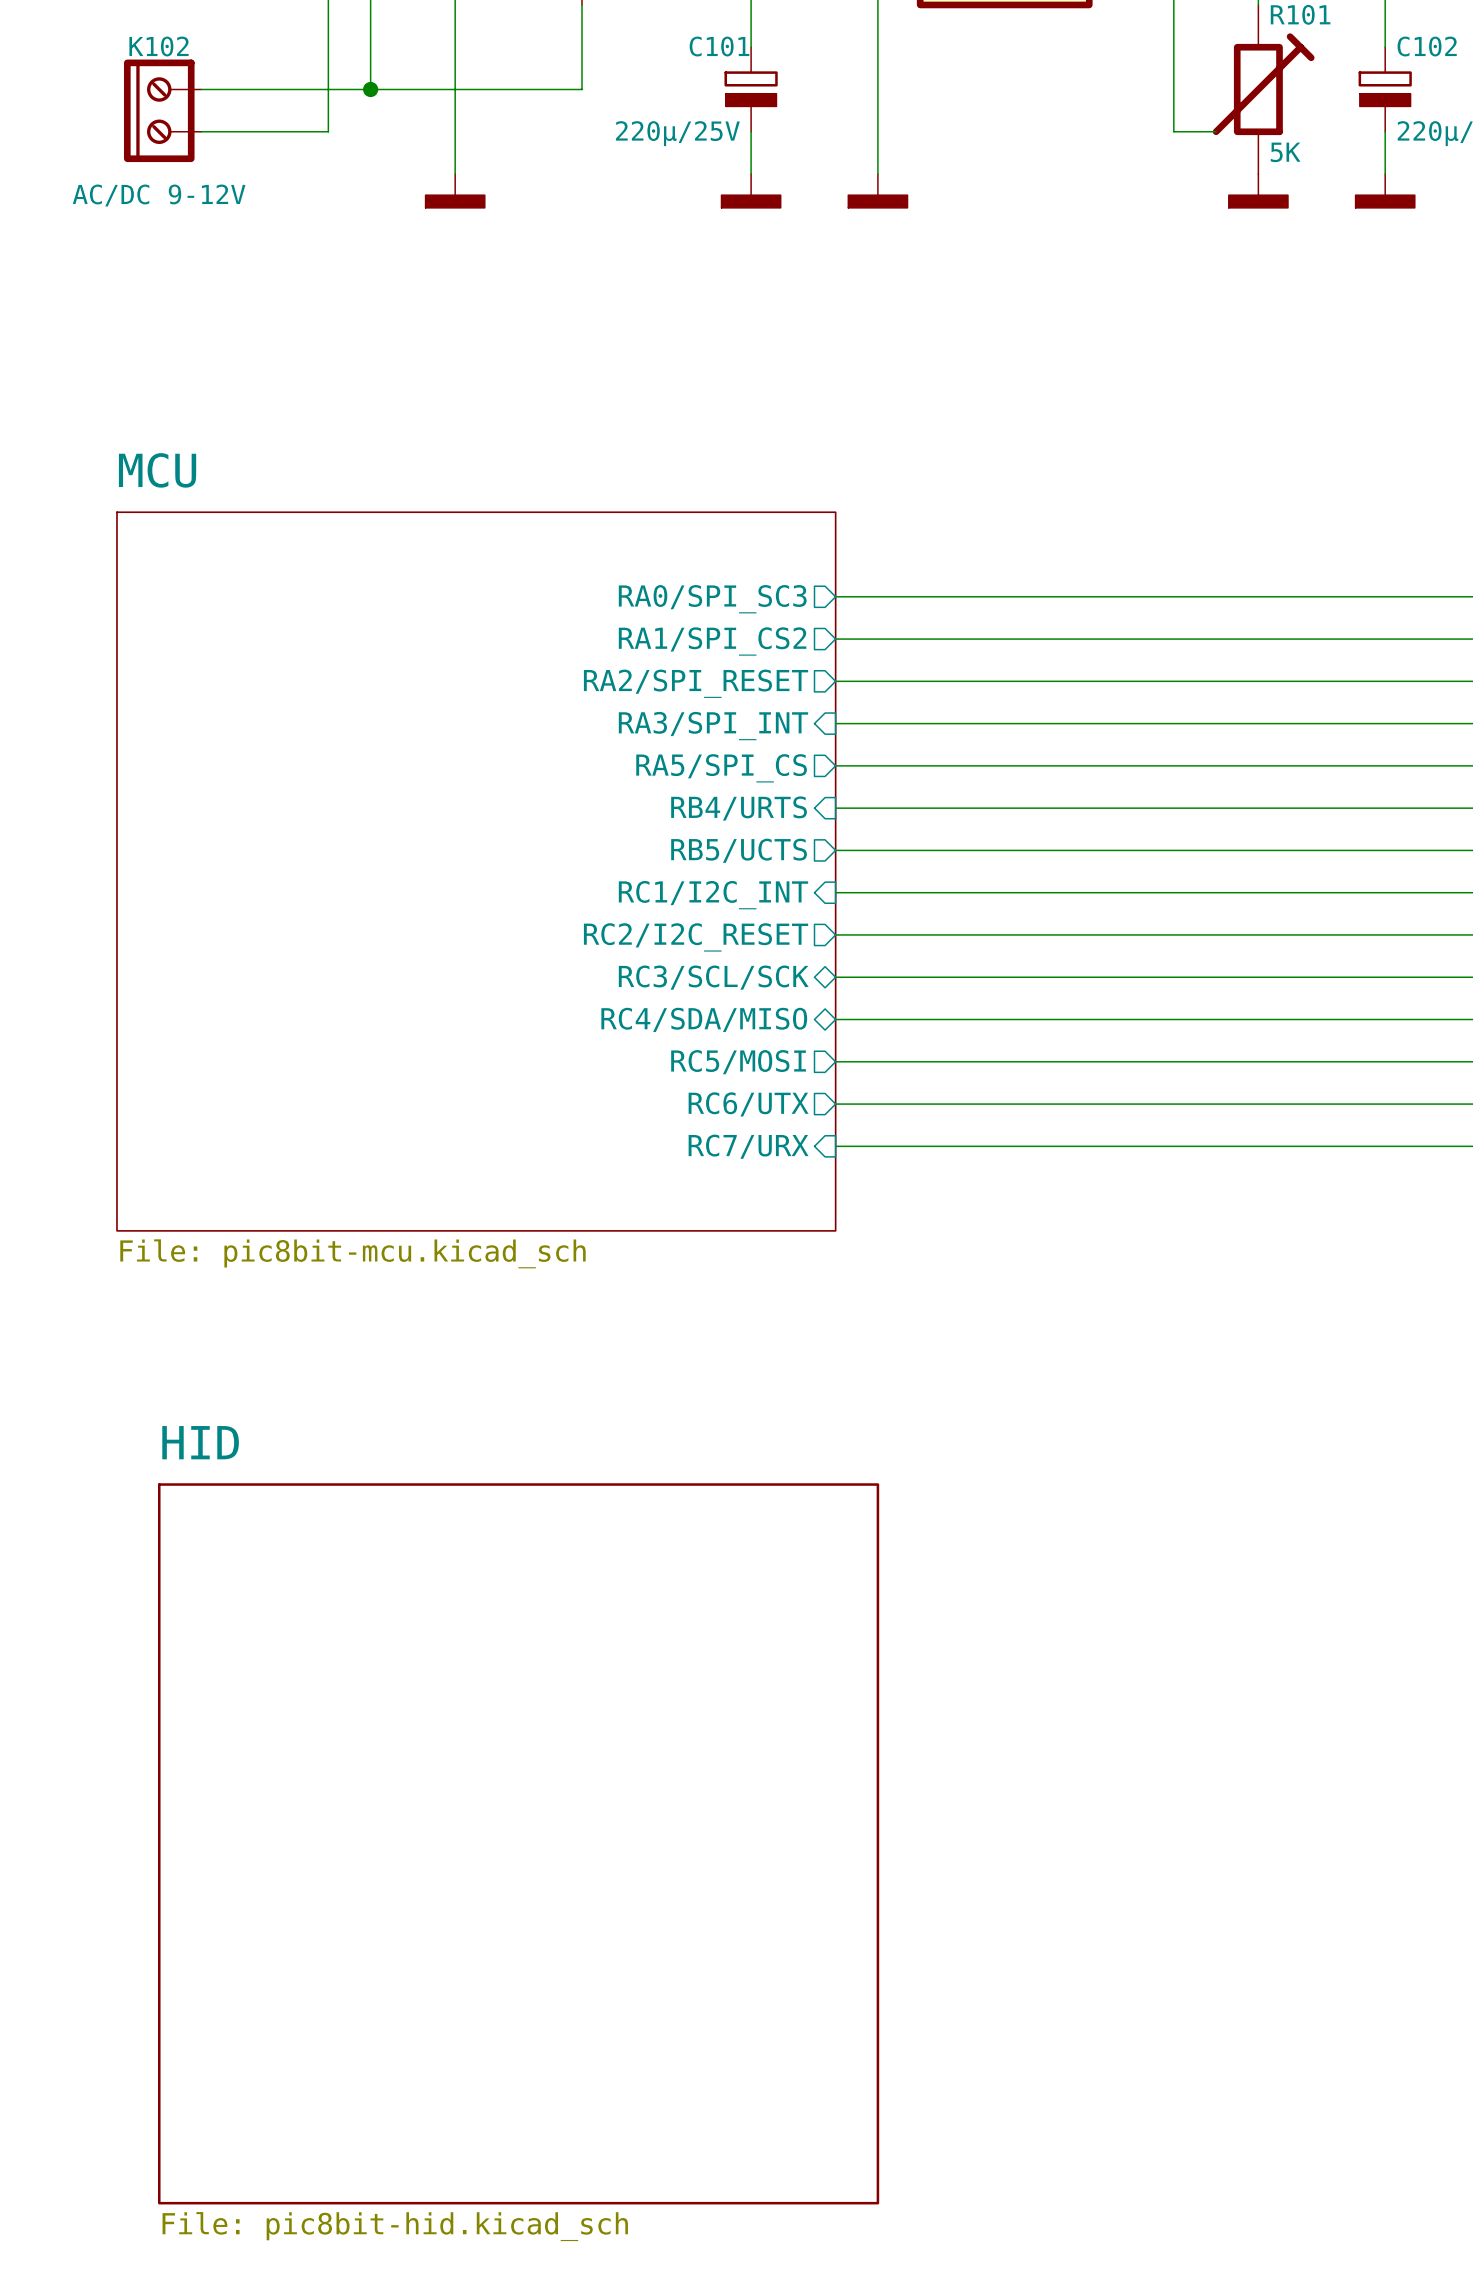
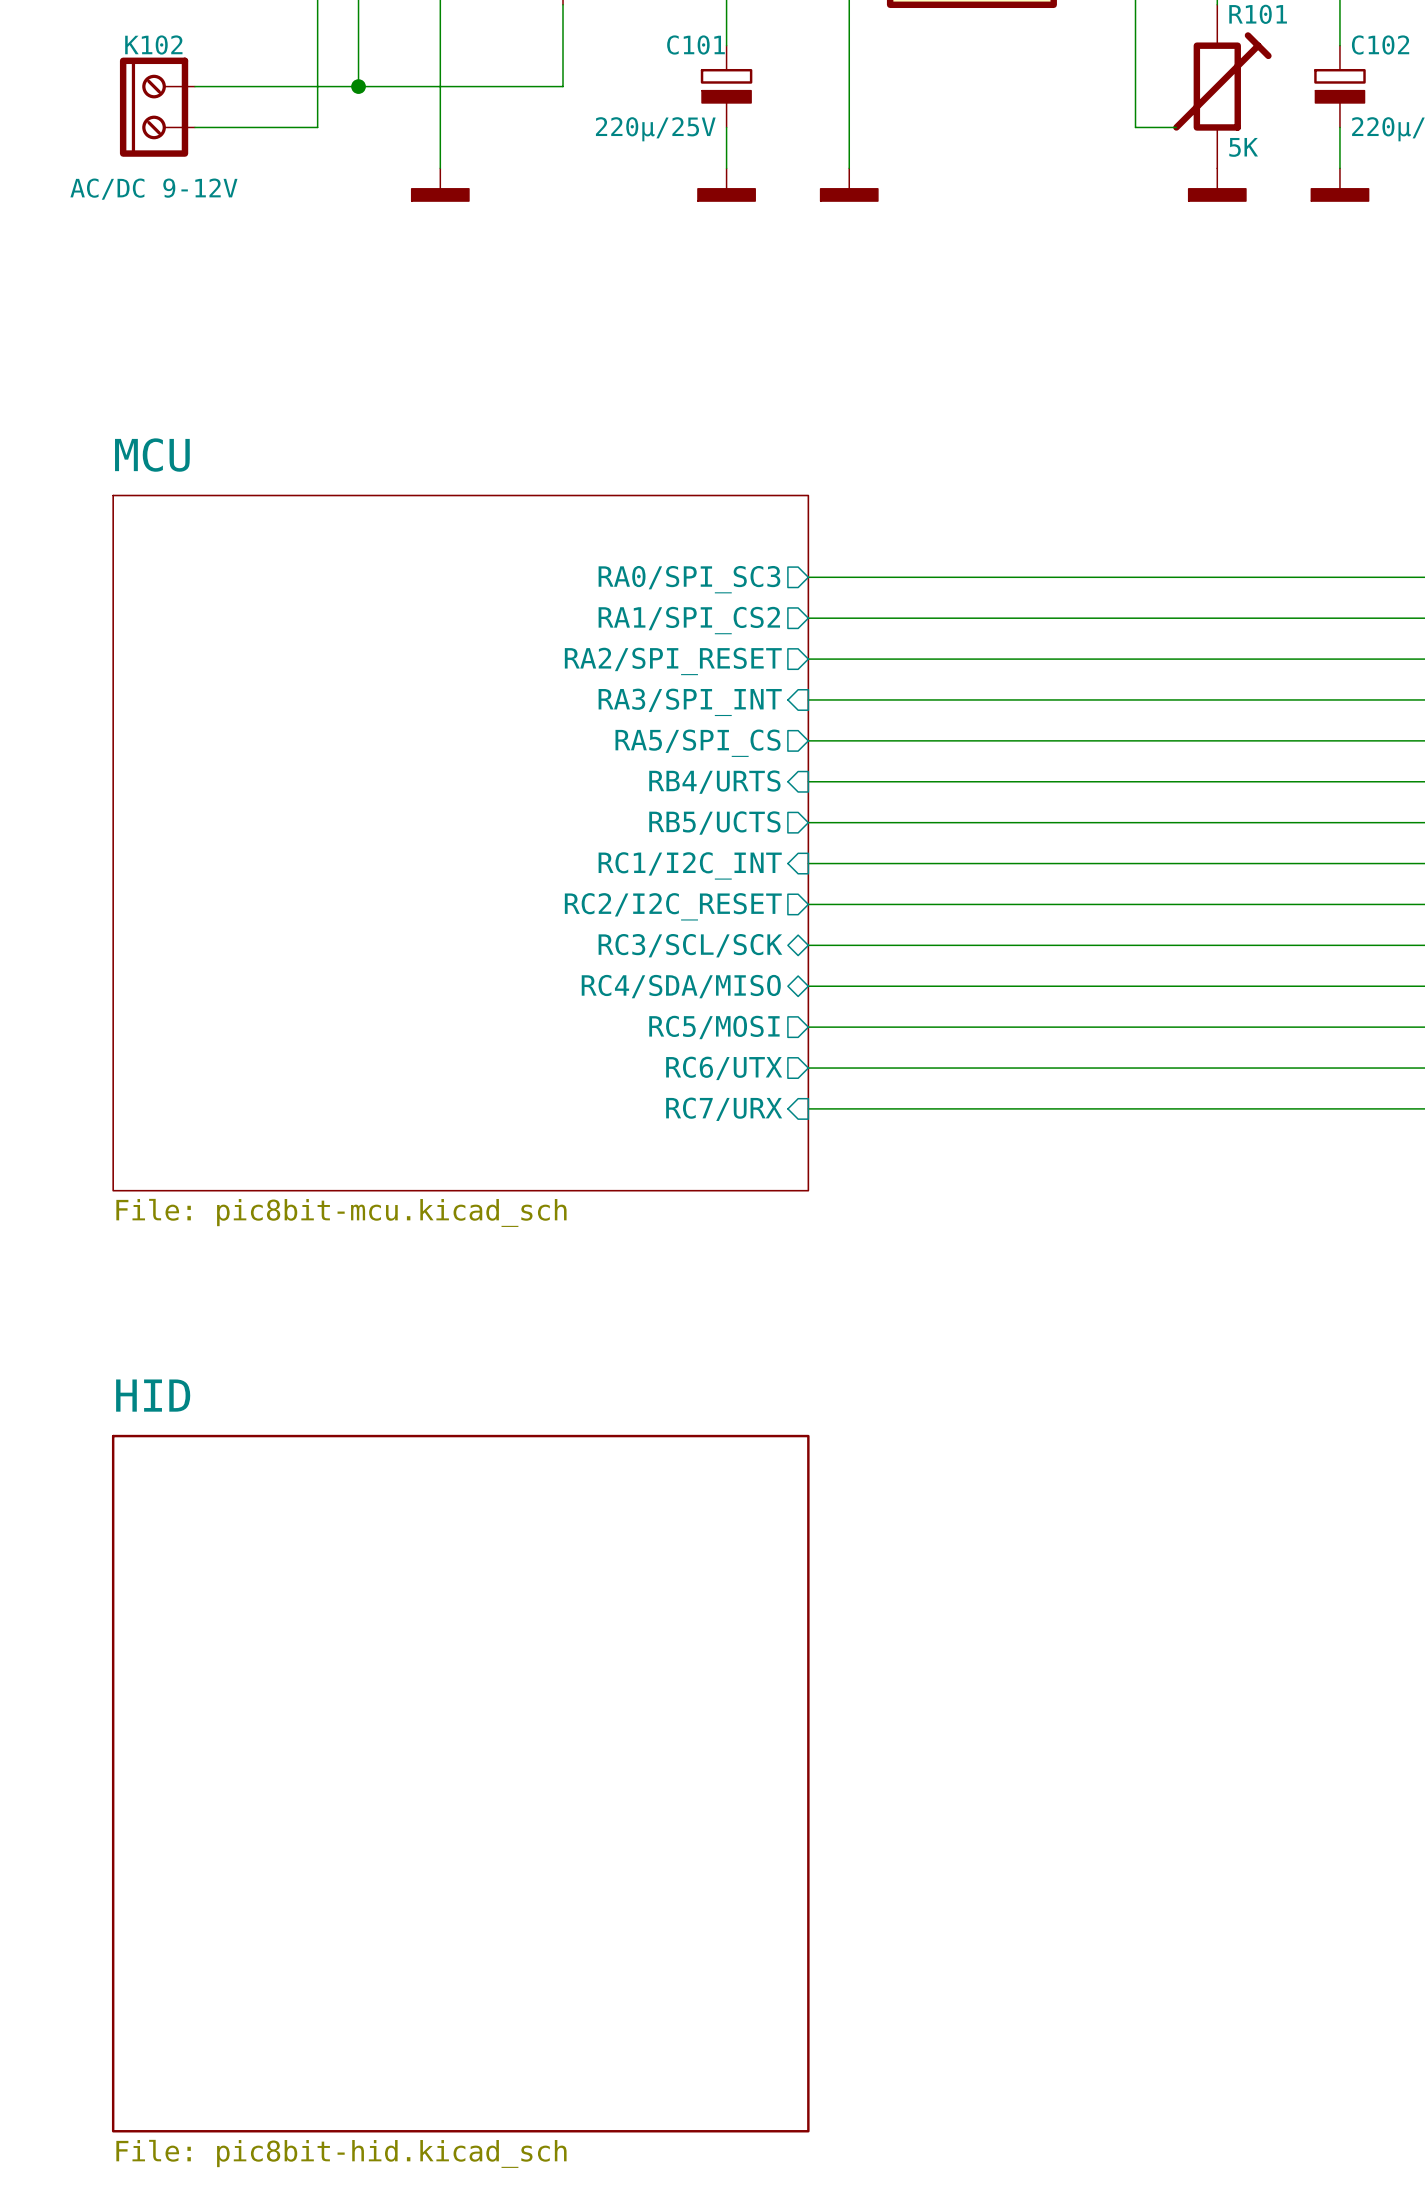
sheet HID position: (518, 1843) -> (460, 1783)

